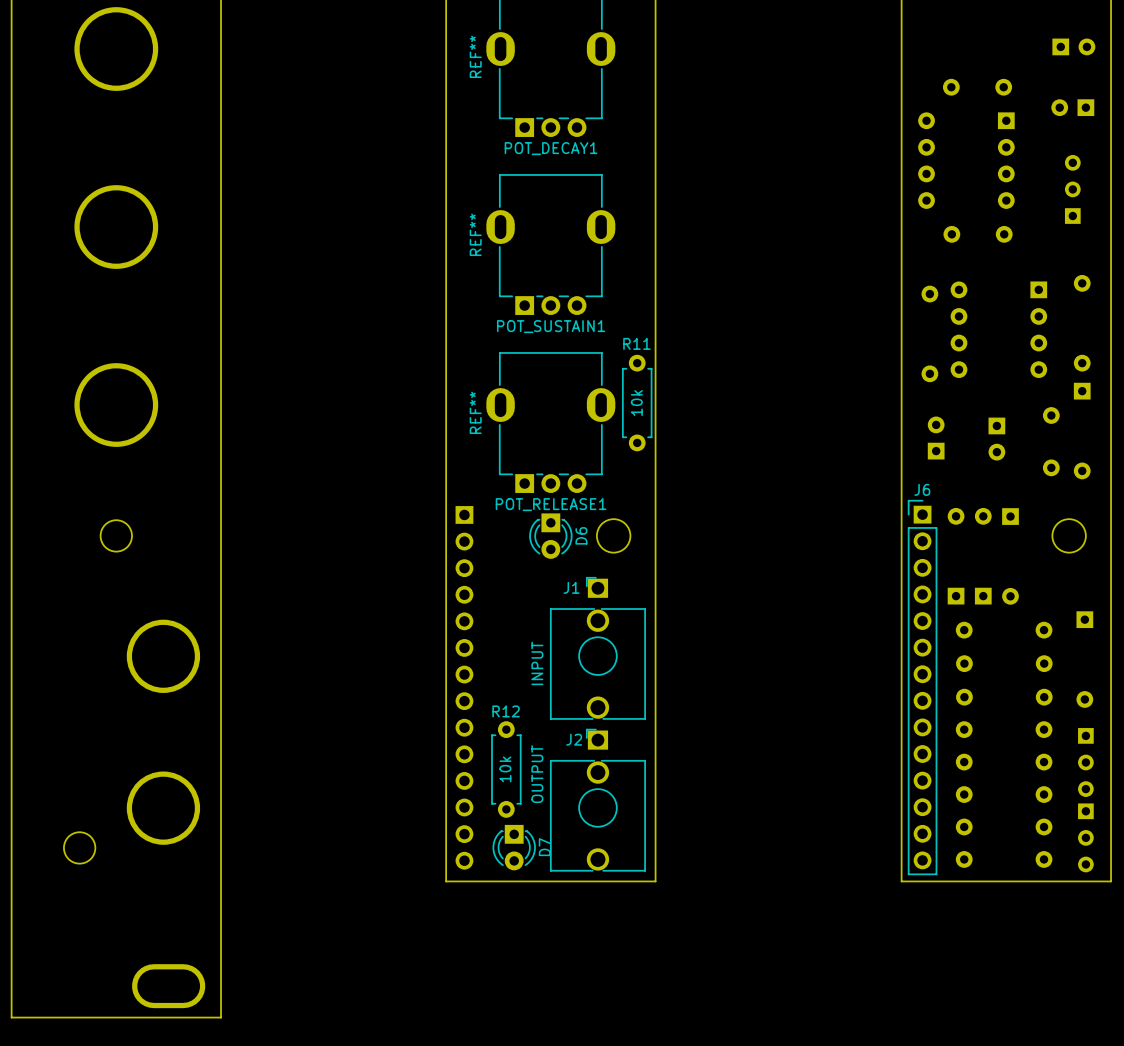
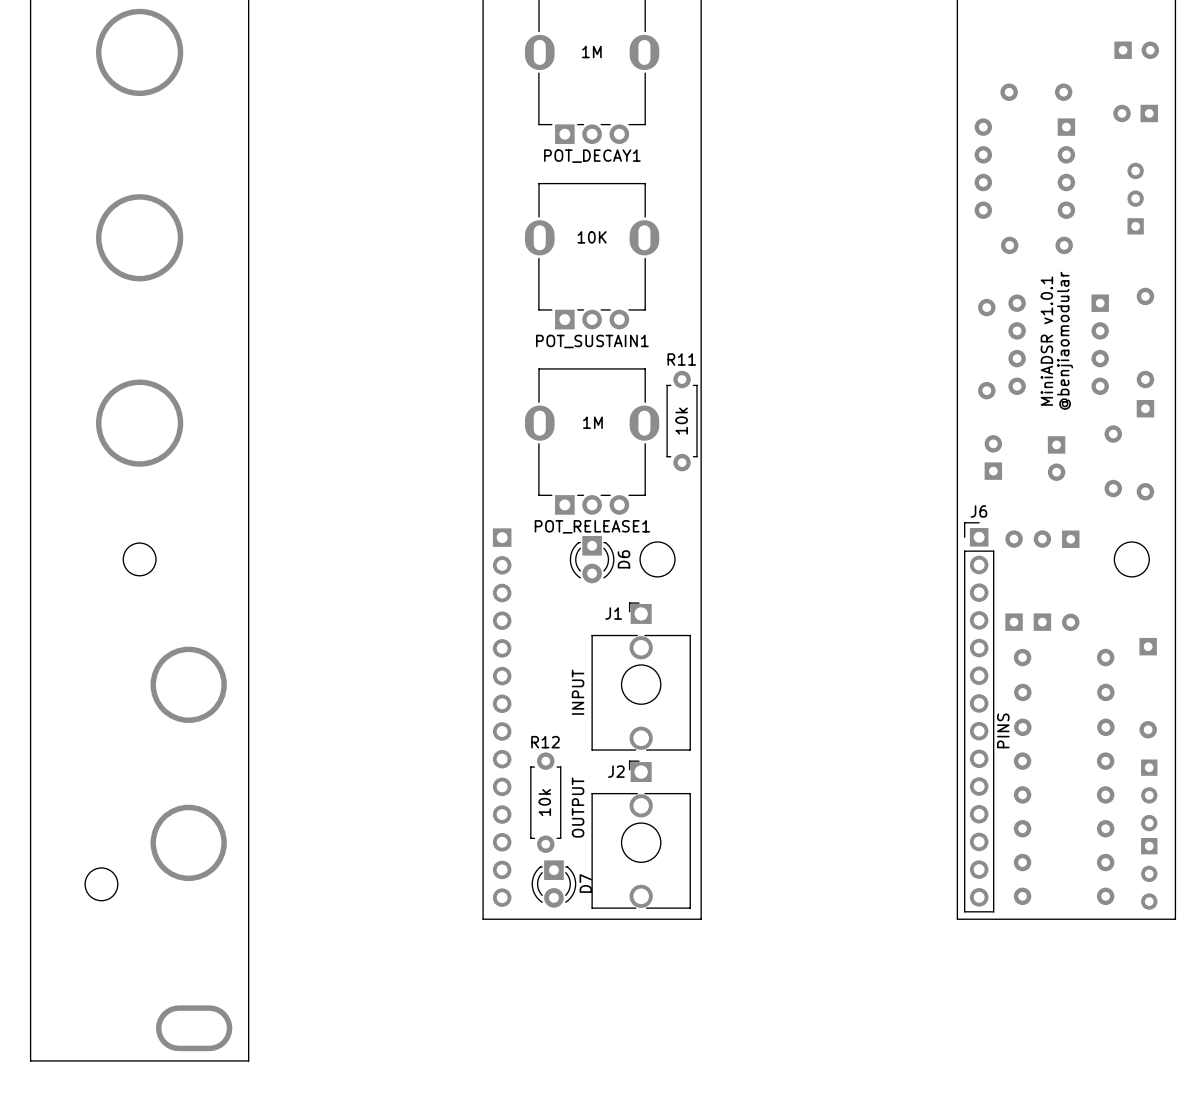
POT_DECAY1 value: none -> 1M (591, 52)
POT_DECAY1 text: REF** (475, 56) -> none
POT_SUSTAIN1 value: none -> 10K (592, 237)
POT_SUSTAIN1 text: REF** (475, 234) -> none
text: none -> @benjiaomodular (1065, 340)
text: none -> MiniADSR v1.0.1 (1046, 341)
POT_RELEASE1 value: none -> 1M (592, 422)
POT_RELEASE1 text: REF** (475, 412) -> none
text: none -> PINS (1003, 730)

